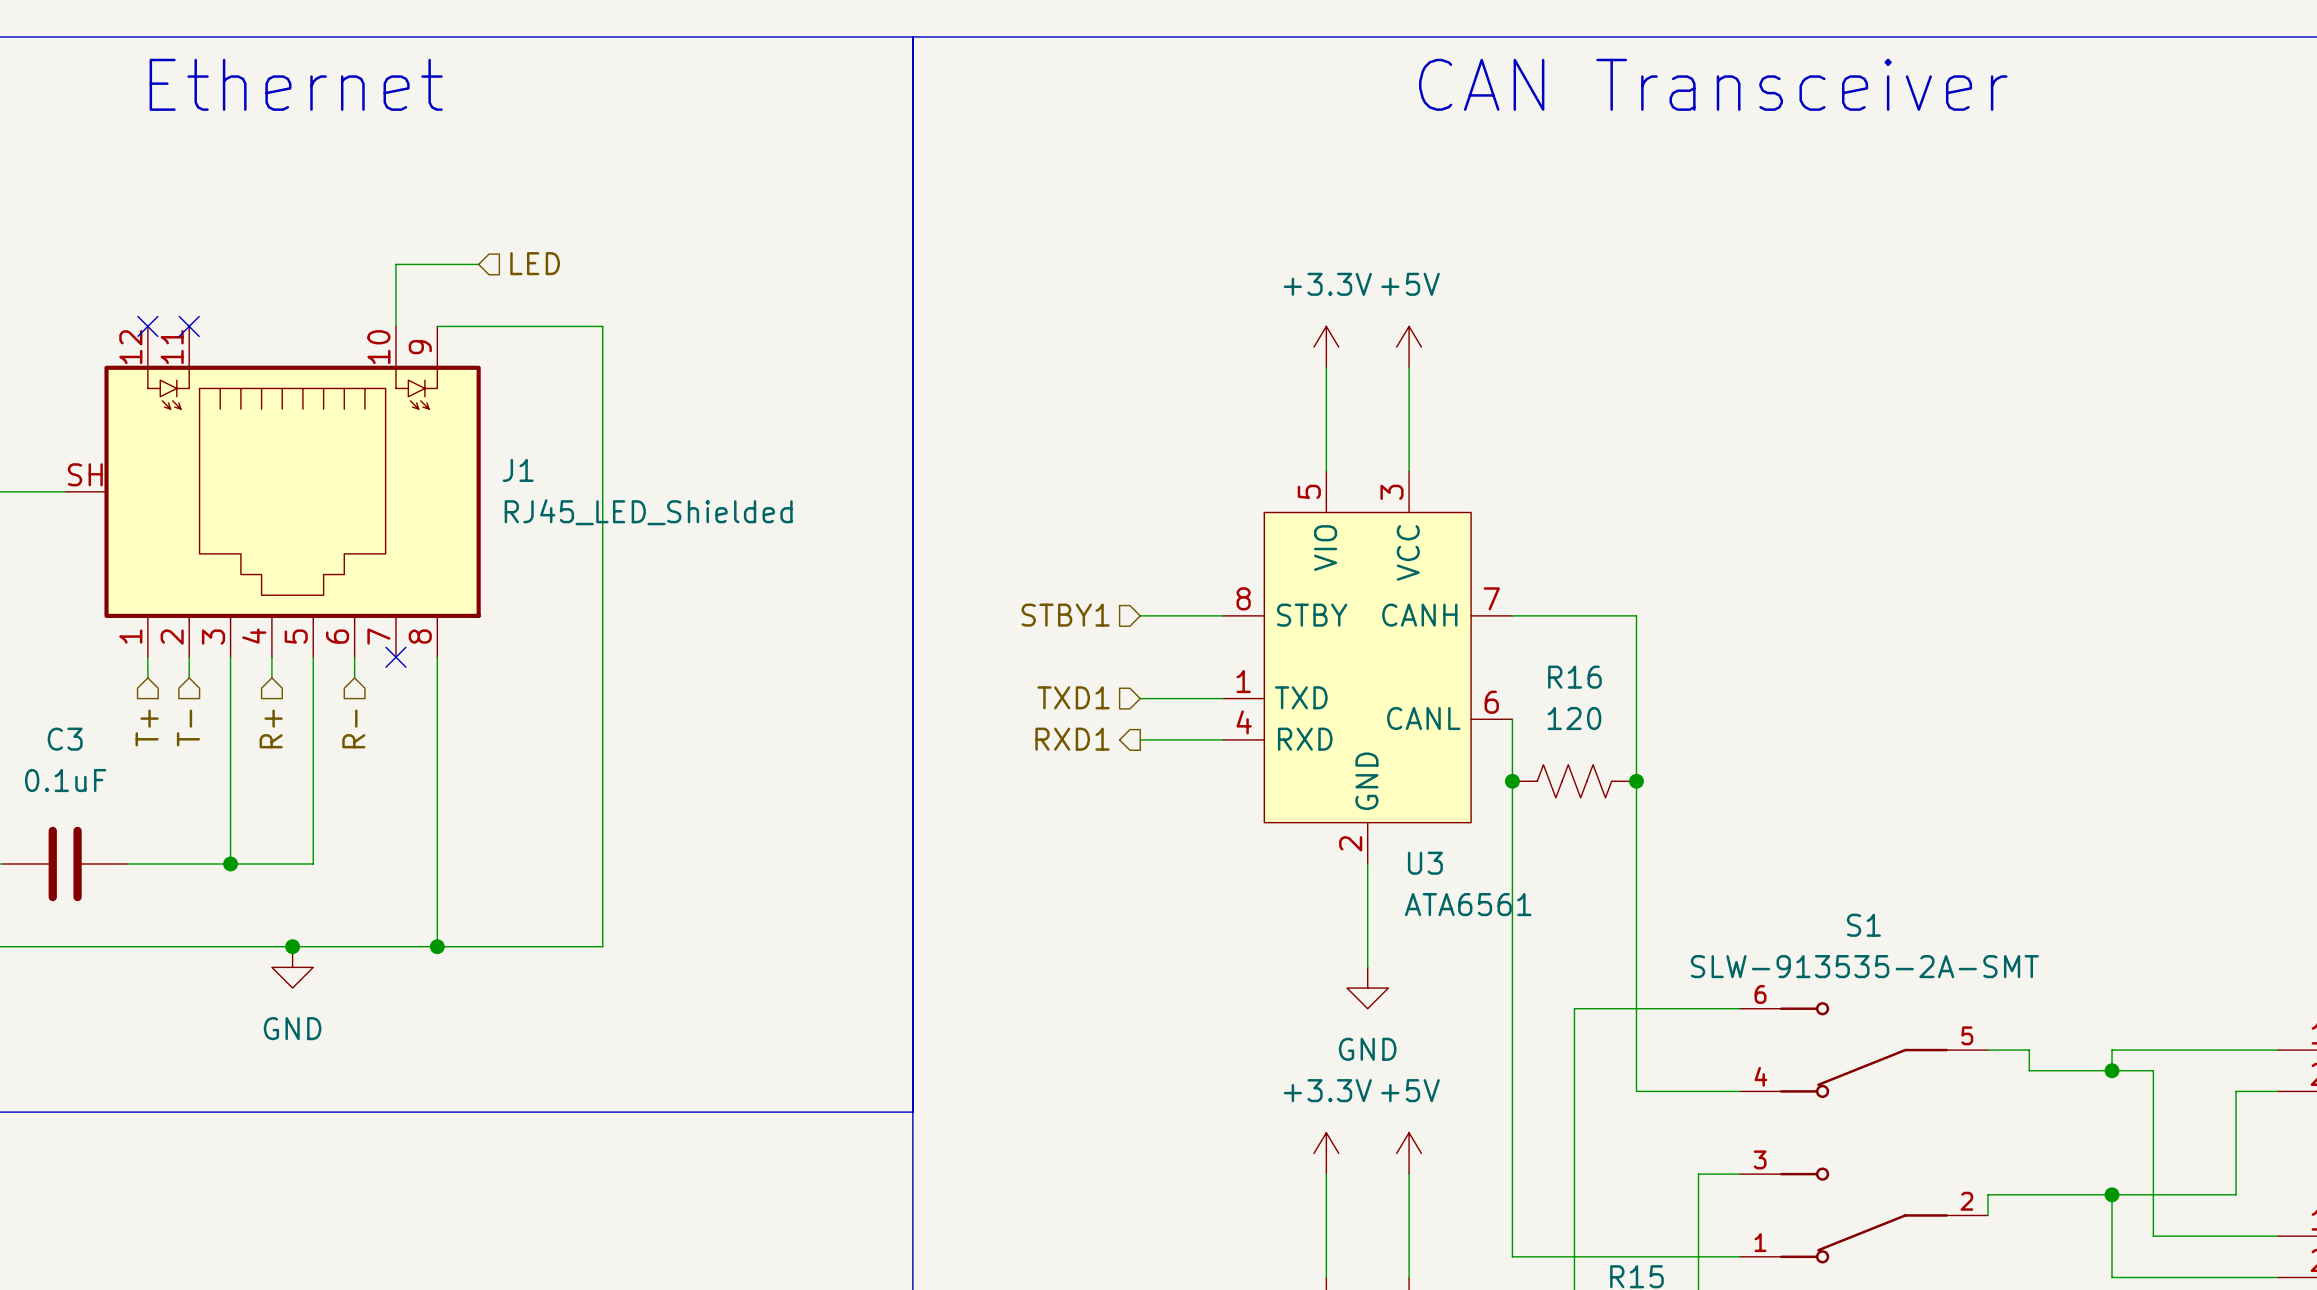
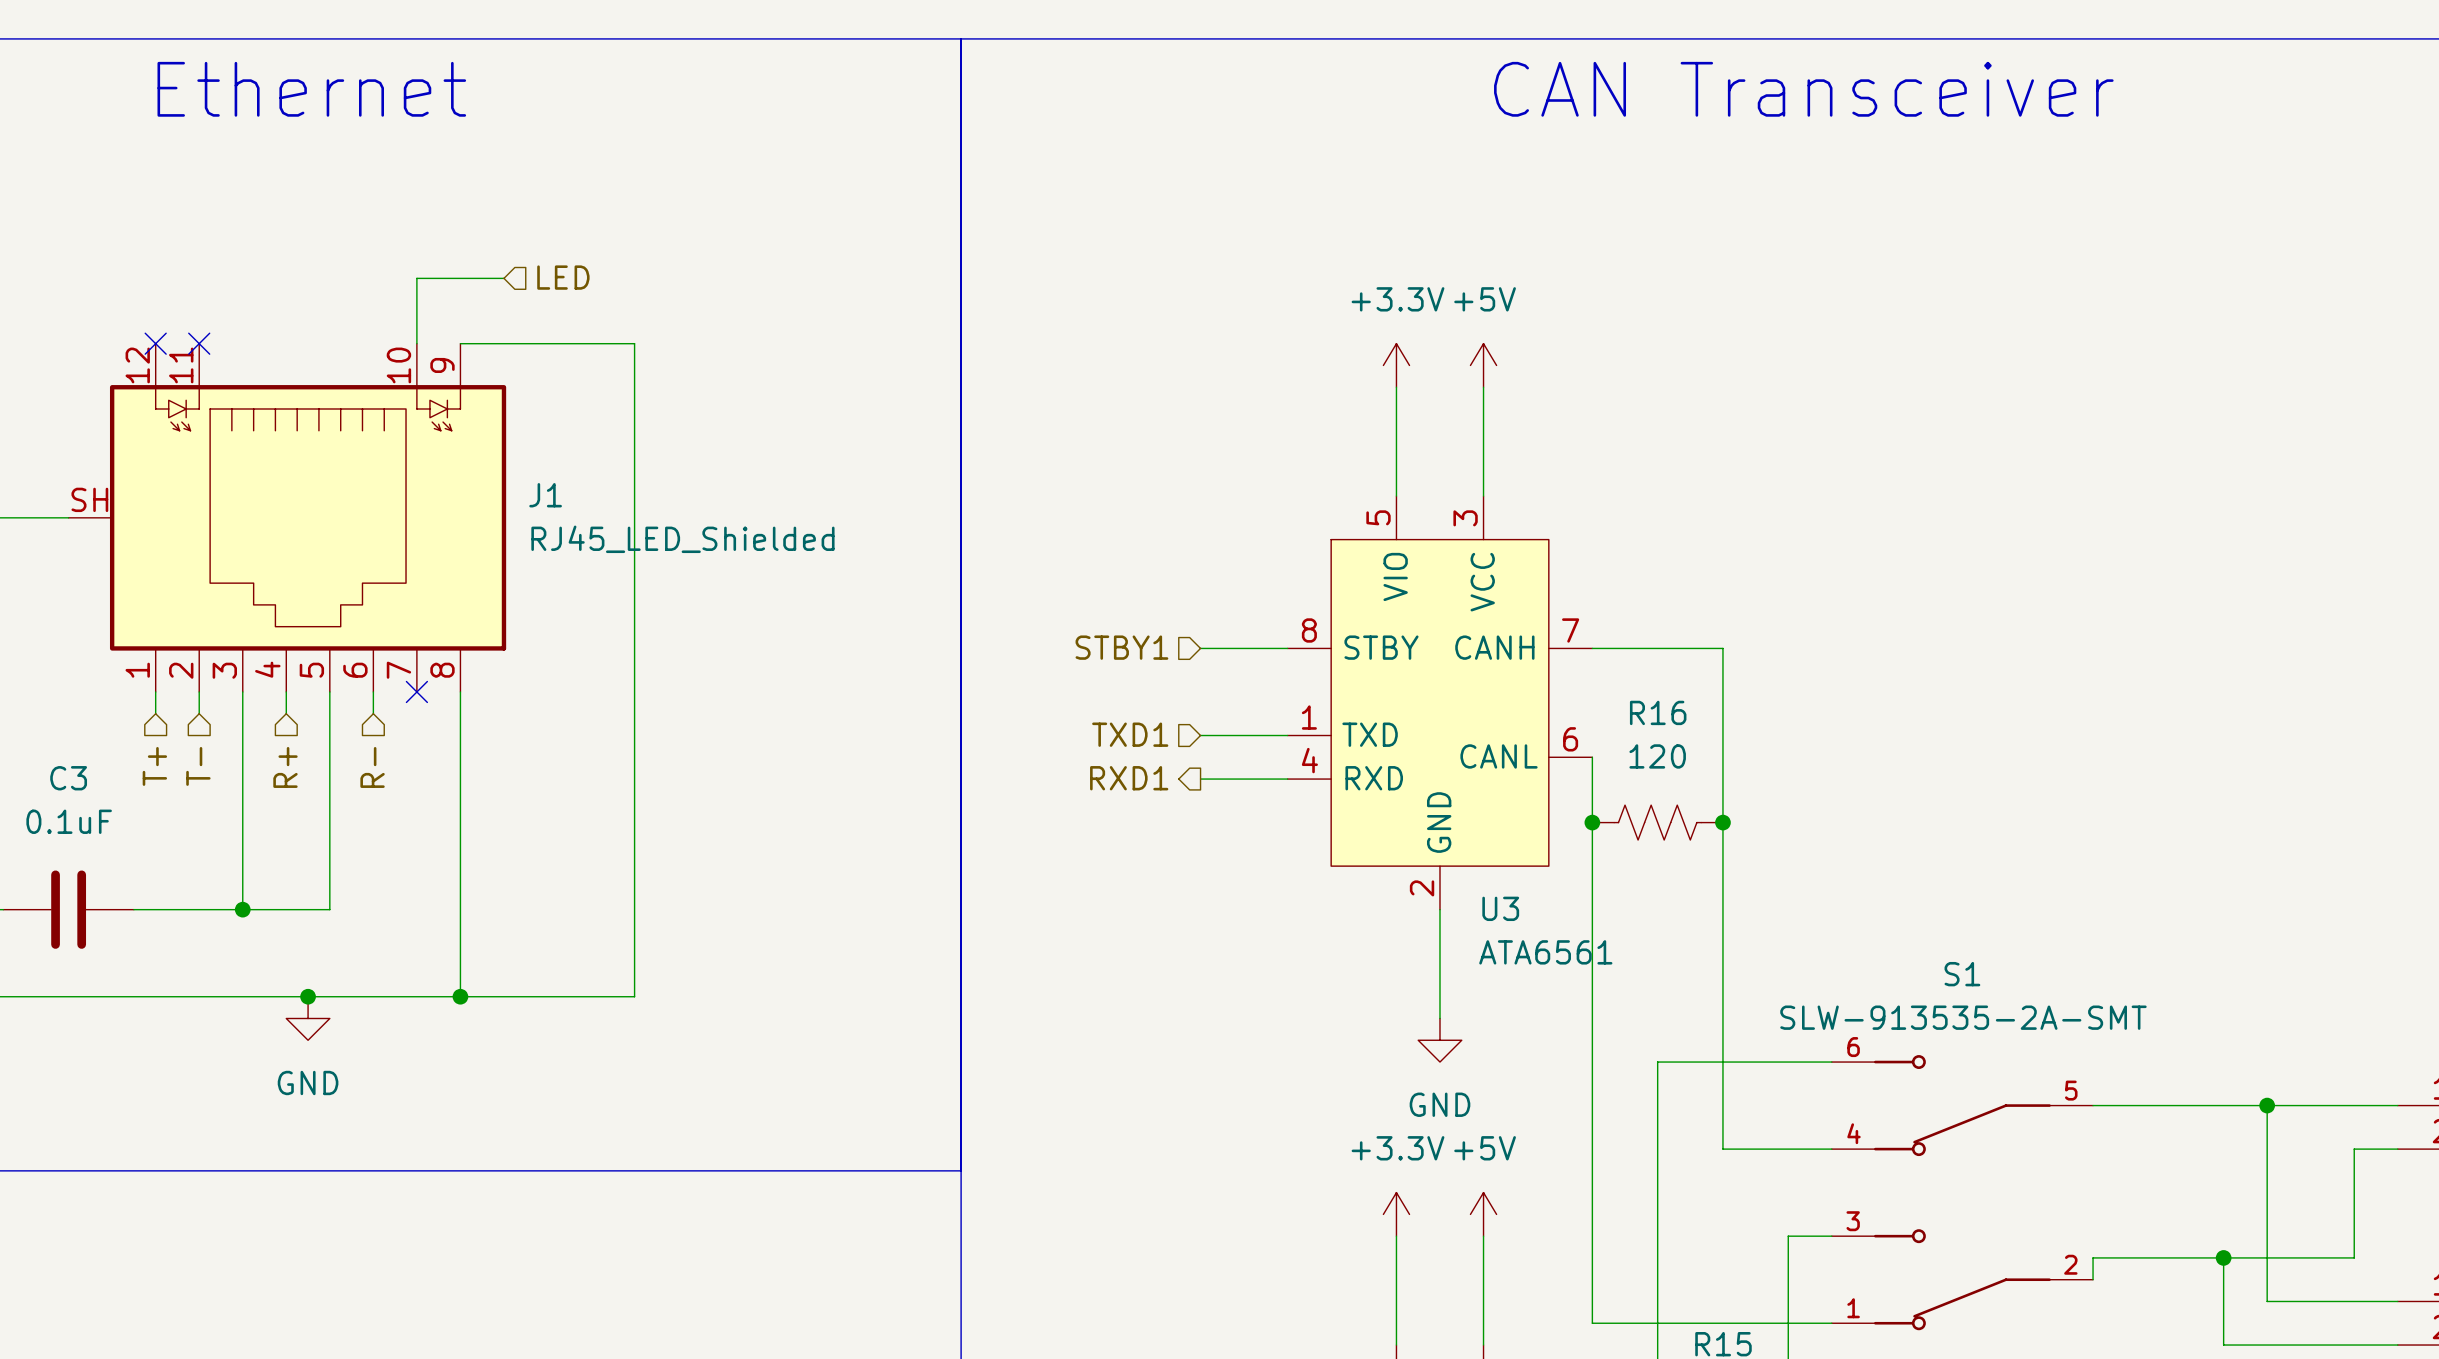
wire: (2029, 1050) (2029, 1070) (2153, 1070) -> (2136, 1105) (2223, 1105)
wire: (2112, 1050) (2112, 1070) -> (2267, 1105) (2267, 1127)
junction position: (2112, 1070) -> (2267, 1105)

